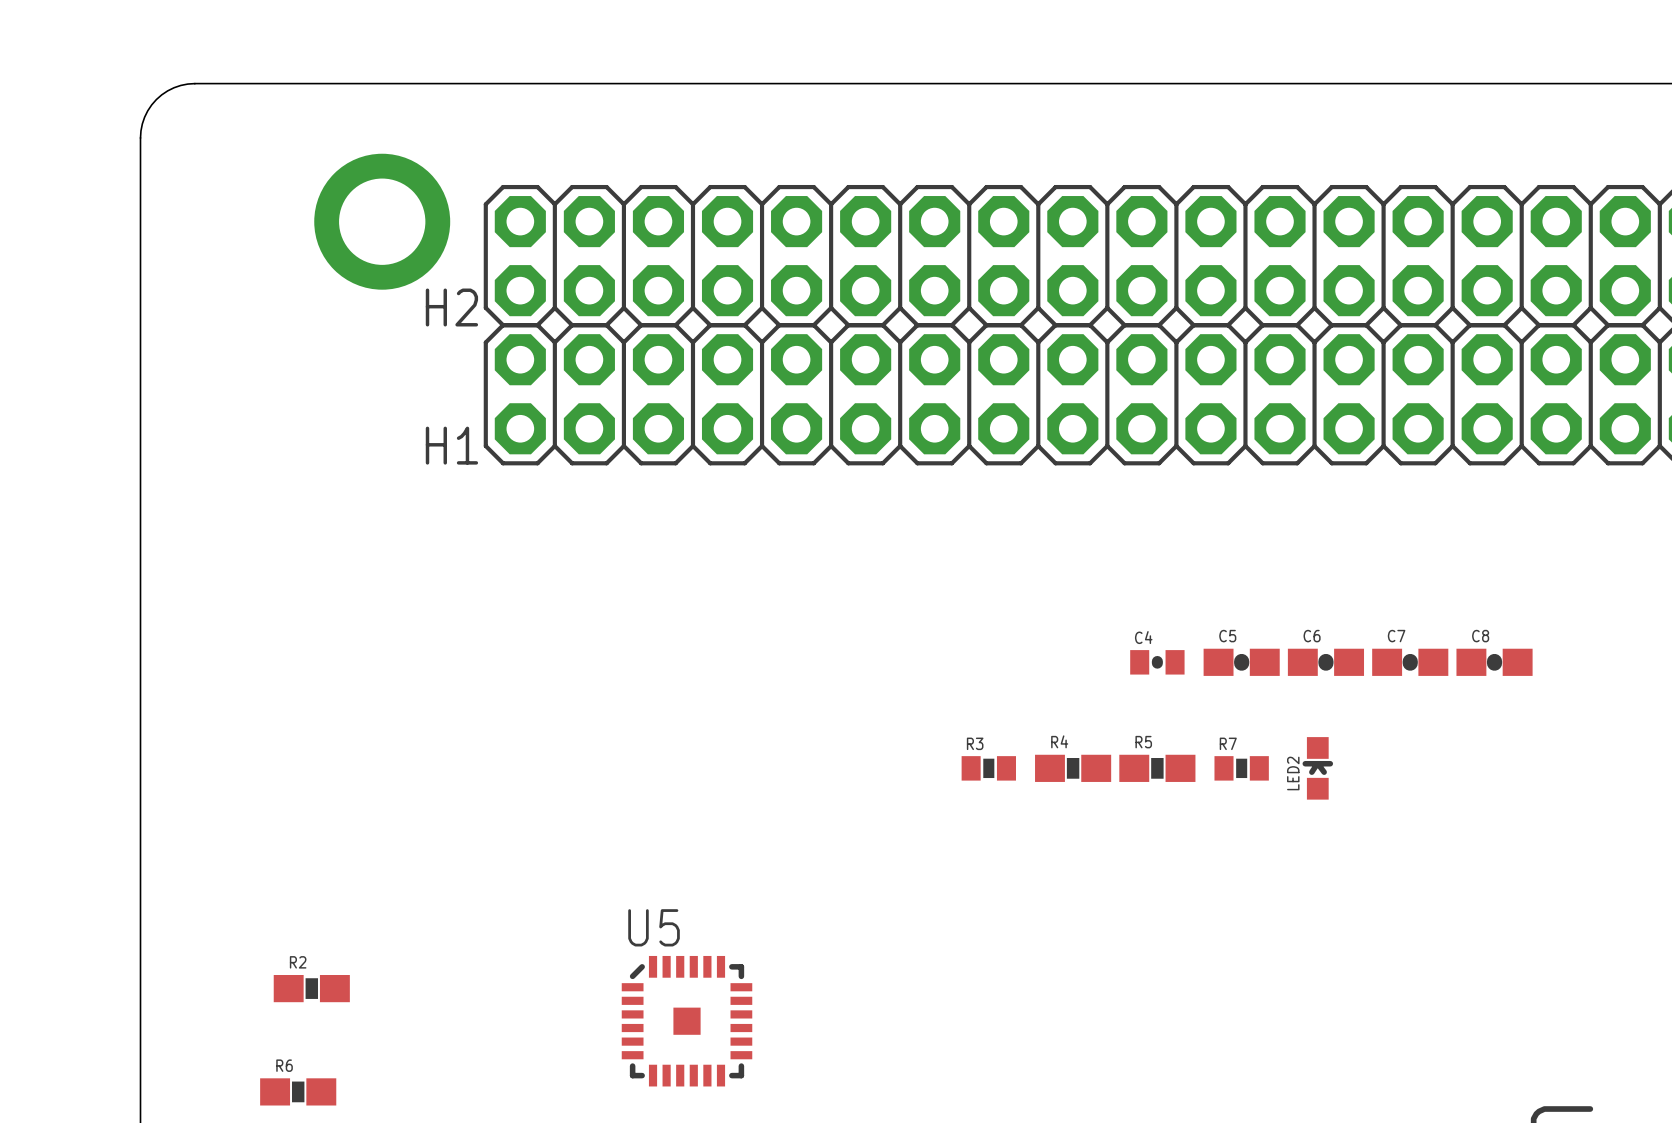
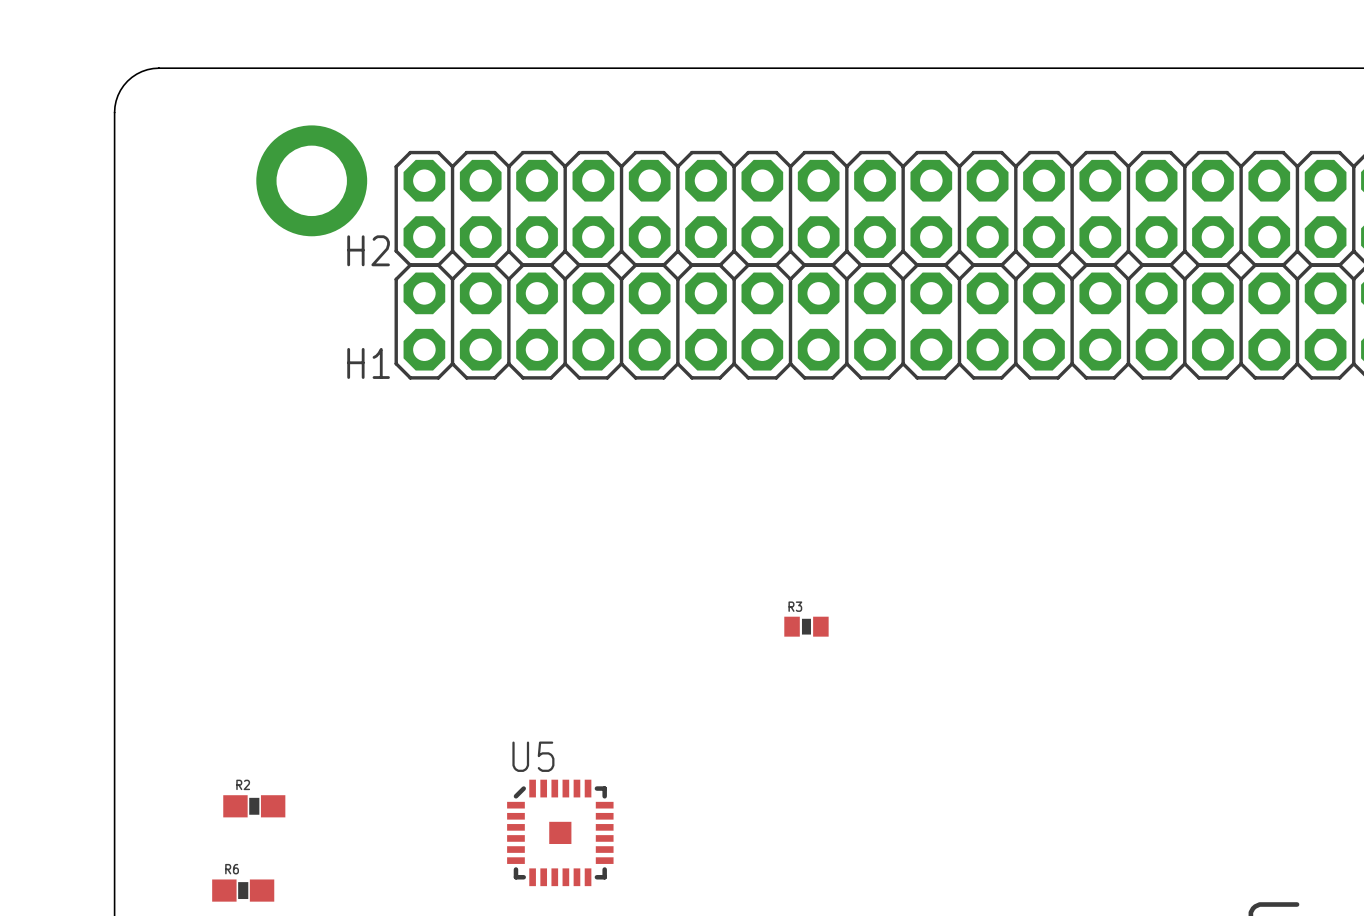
C4: (1157, 662) -> none
C5: (1241, 662) -> none
C6: (1325, 662) -> none
C7: (1410, 662) -> none
C8: (1494, 662) -> none
R4: (1073, 768) -> none
R5: (1157, 768) -> none
R7: (1241, 768) -> none
LED2: (1317, 768) -> none

